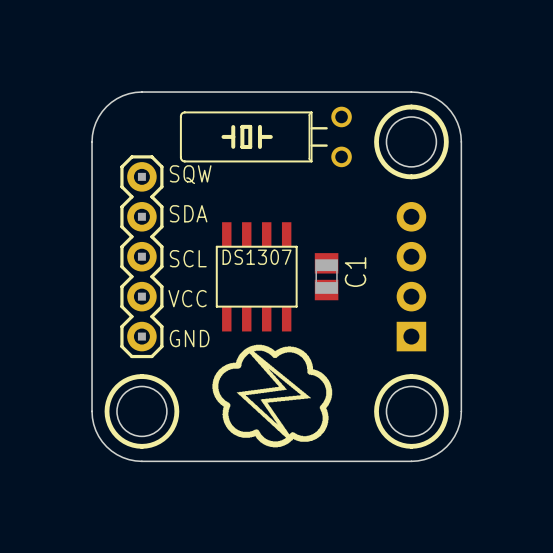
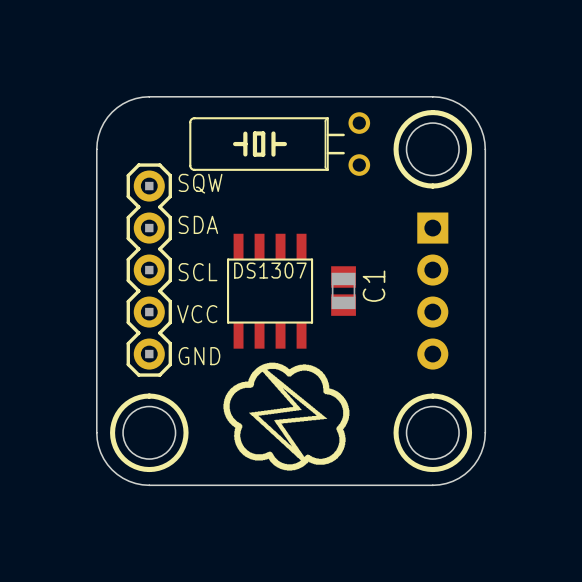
part rotation: 0° (411, 276) -> 180° (432, 291)

